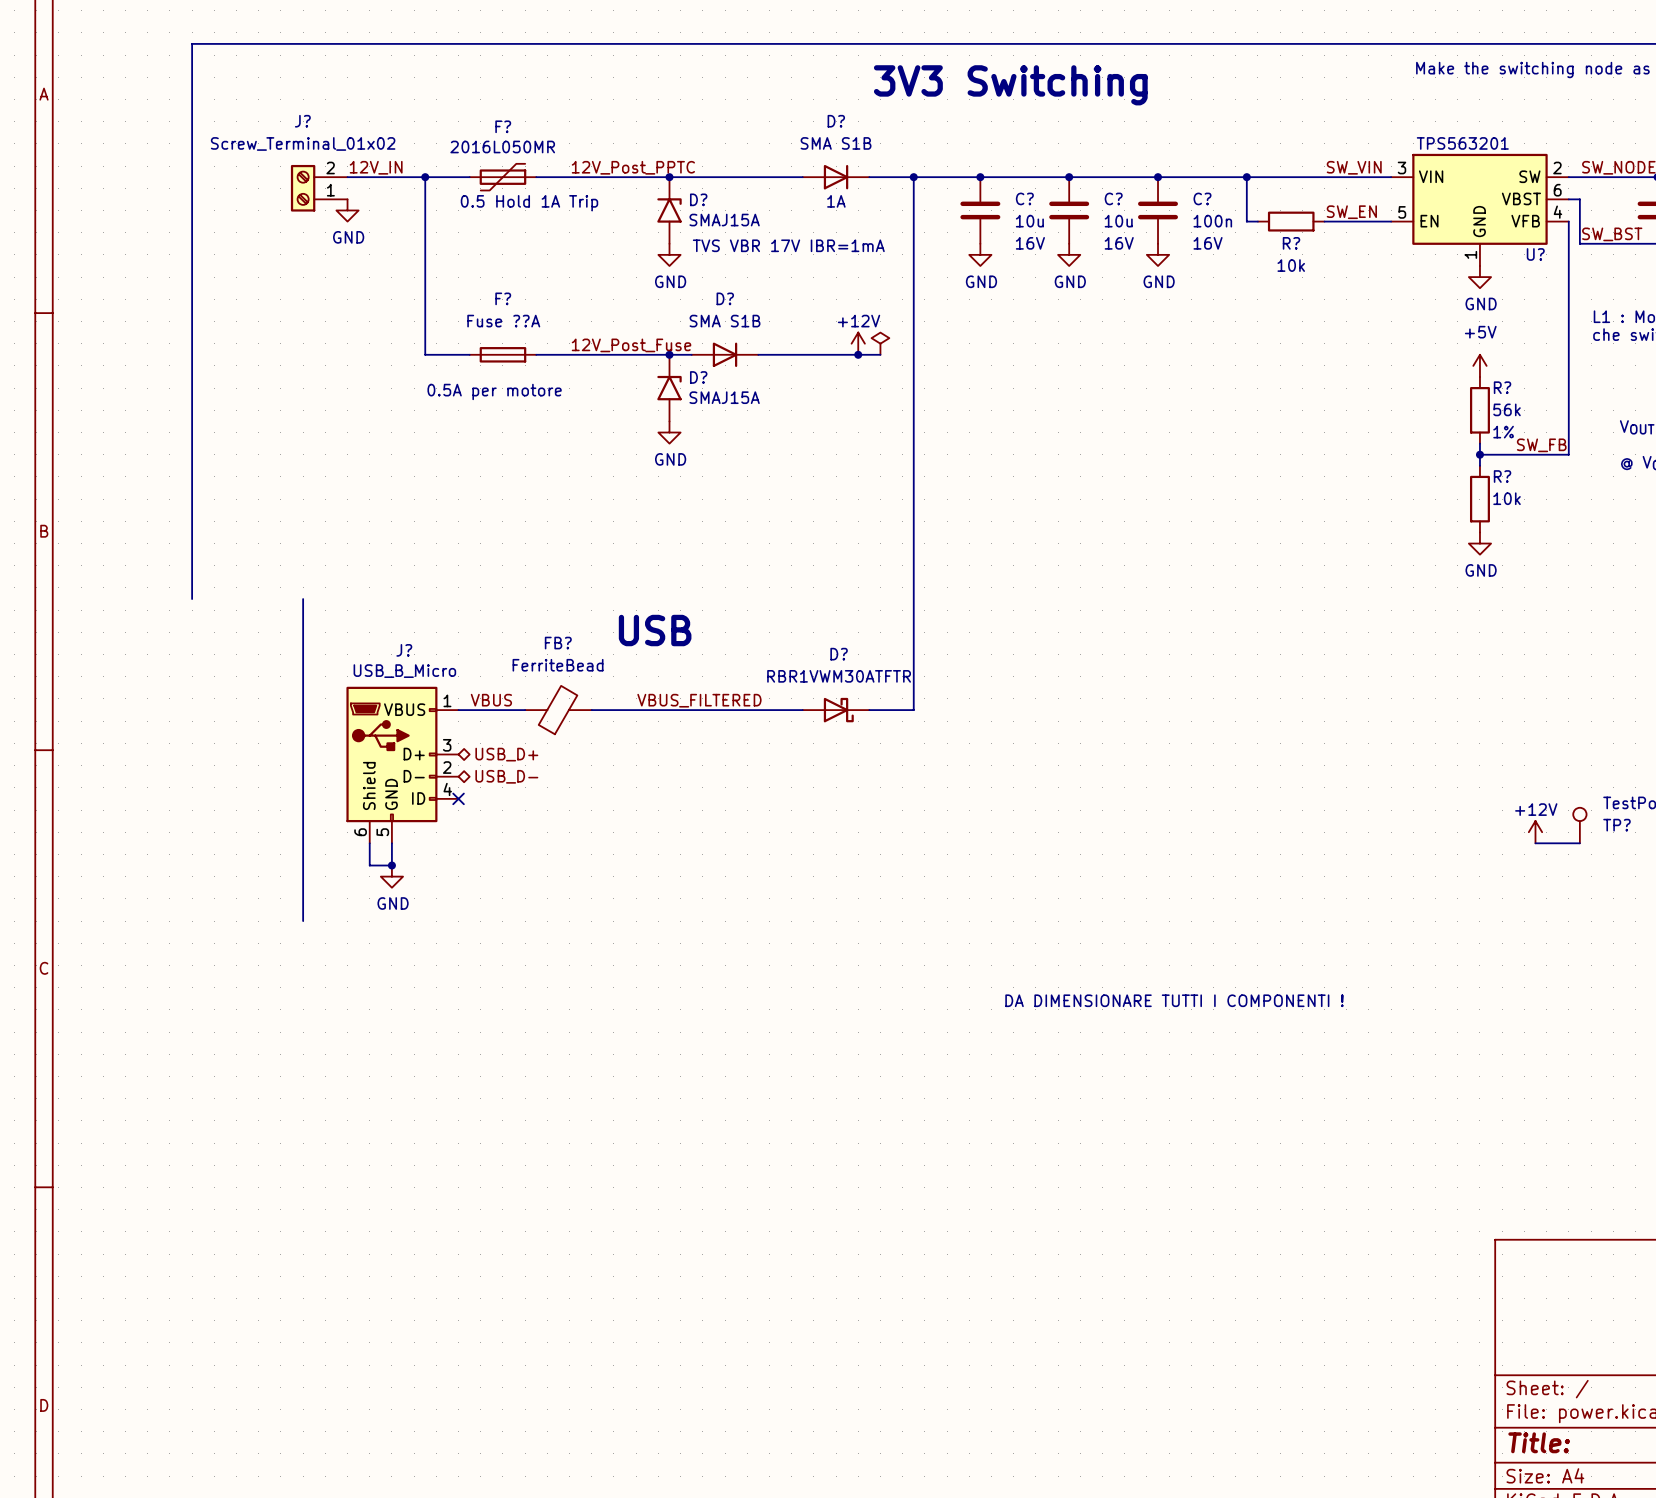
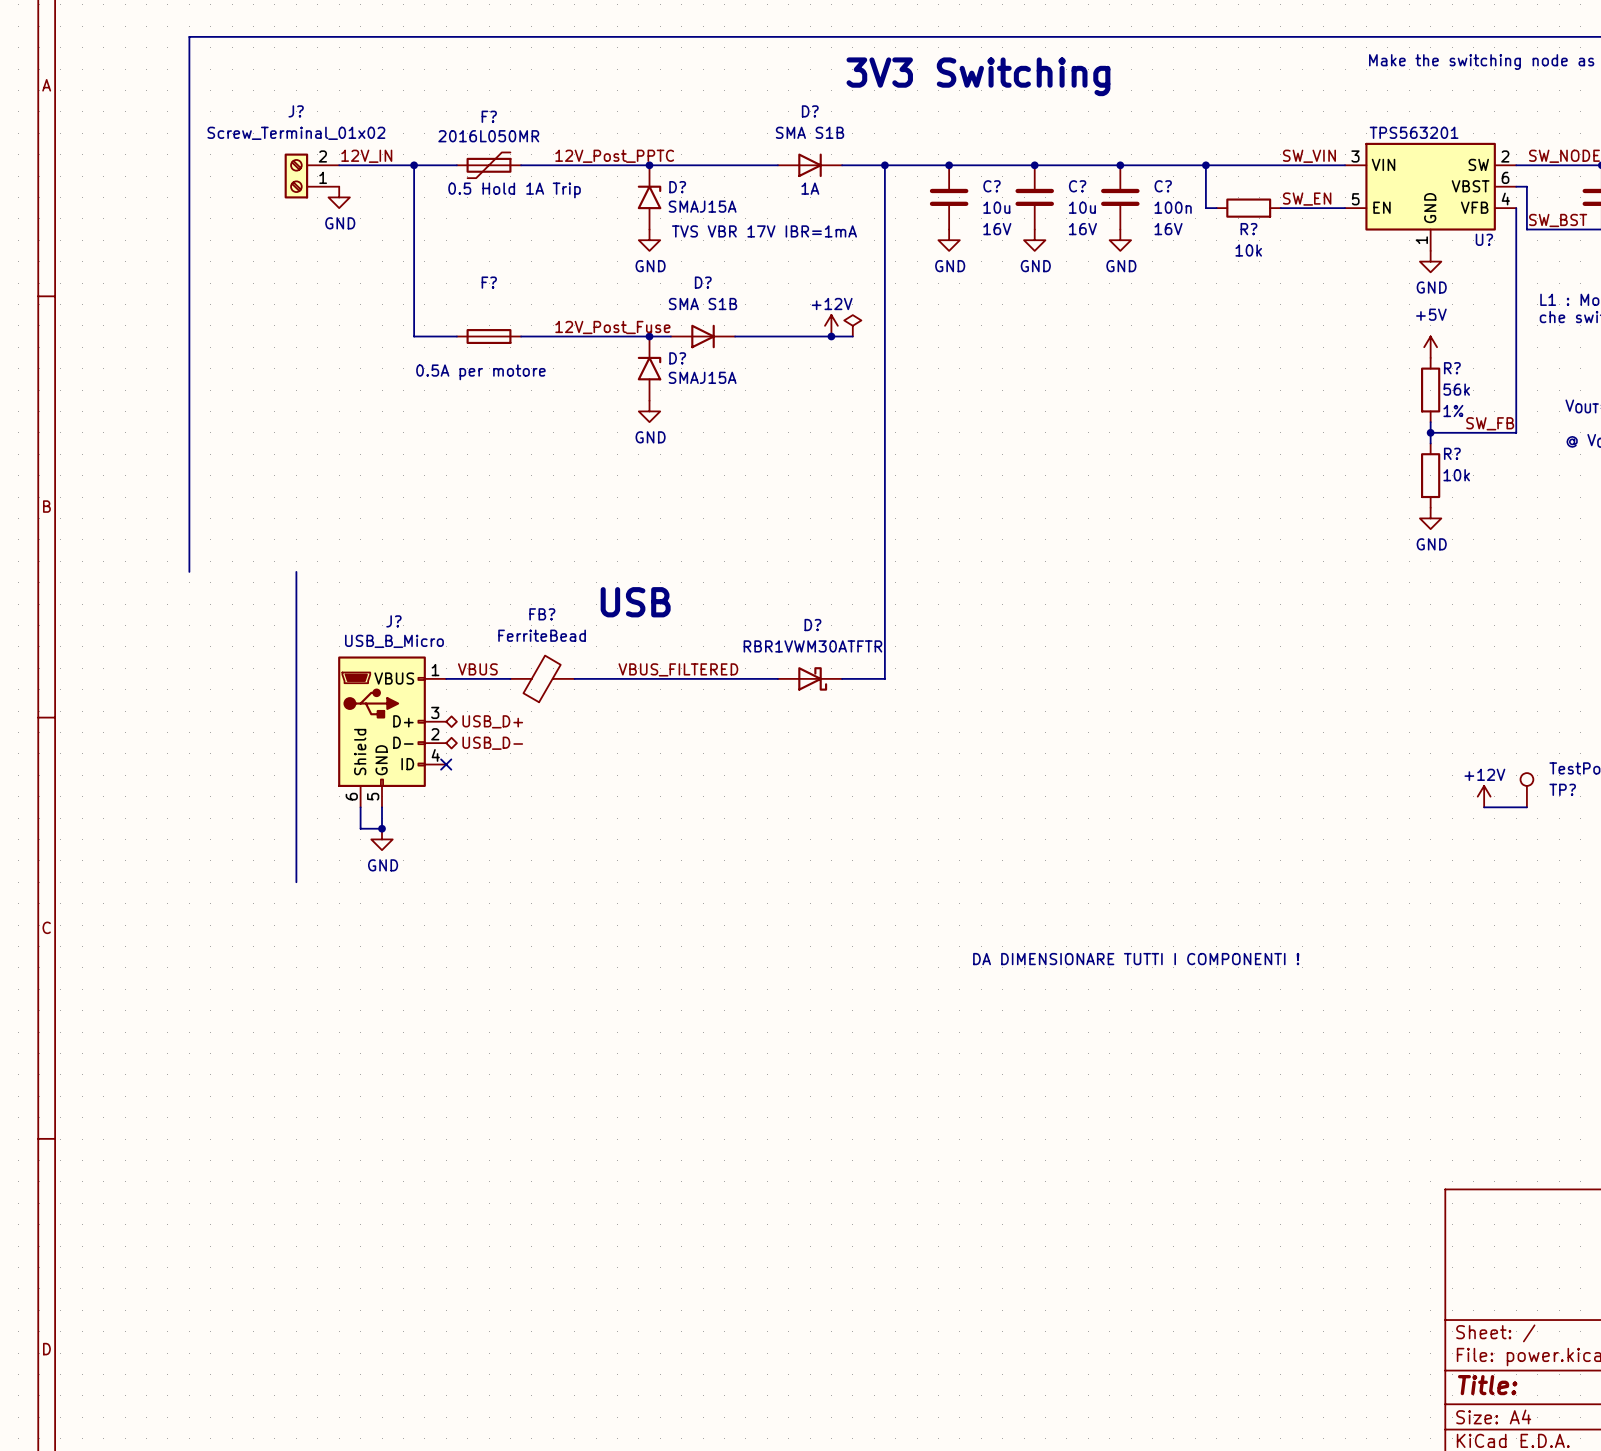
F? value: Fuse ??A (503, 321) -> none

